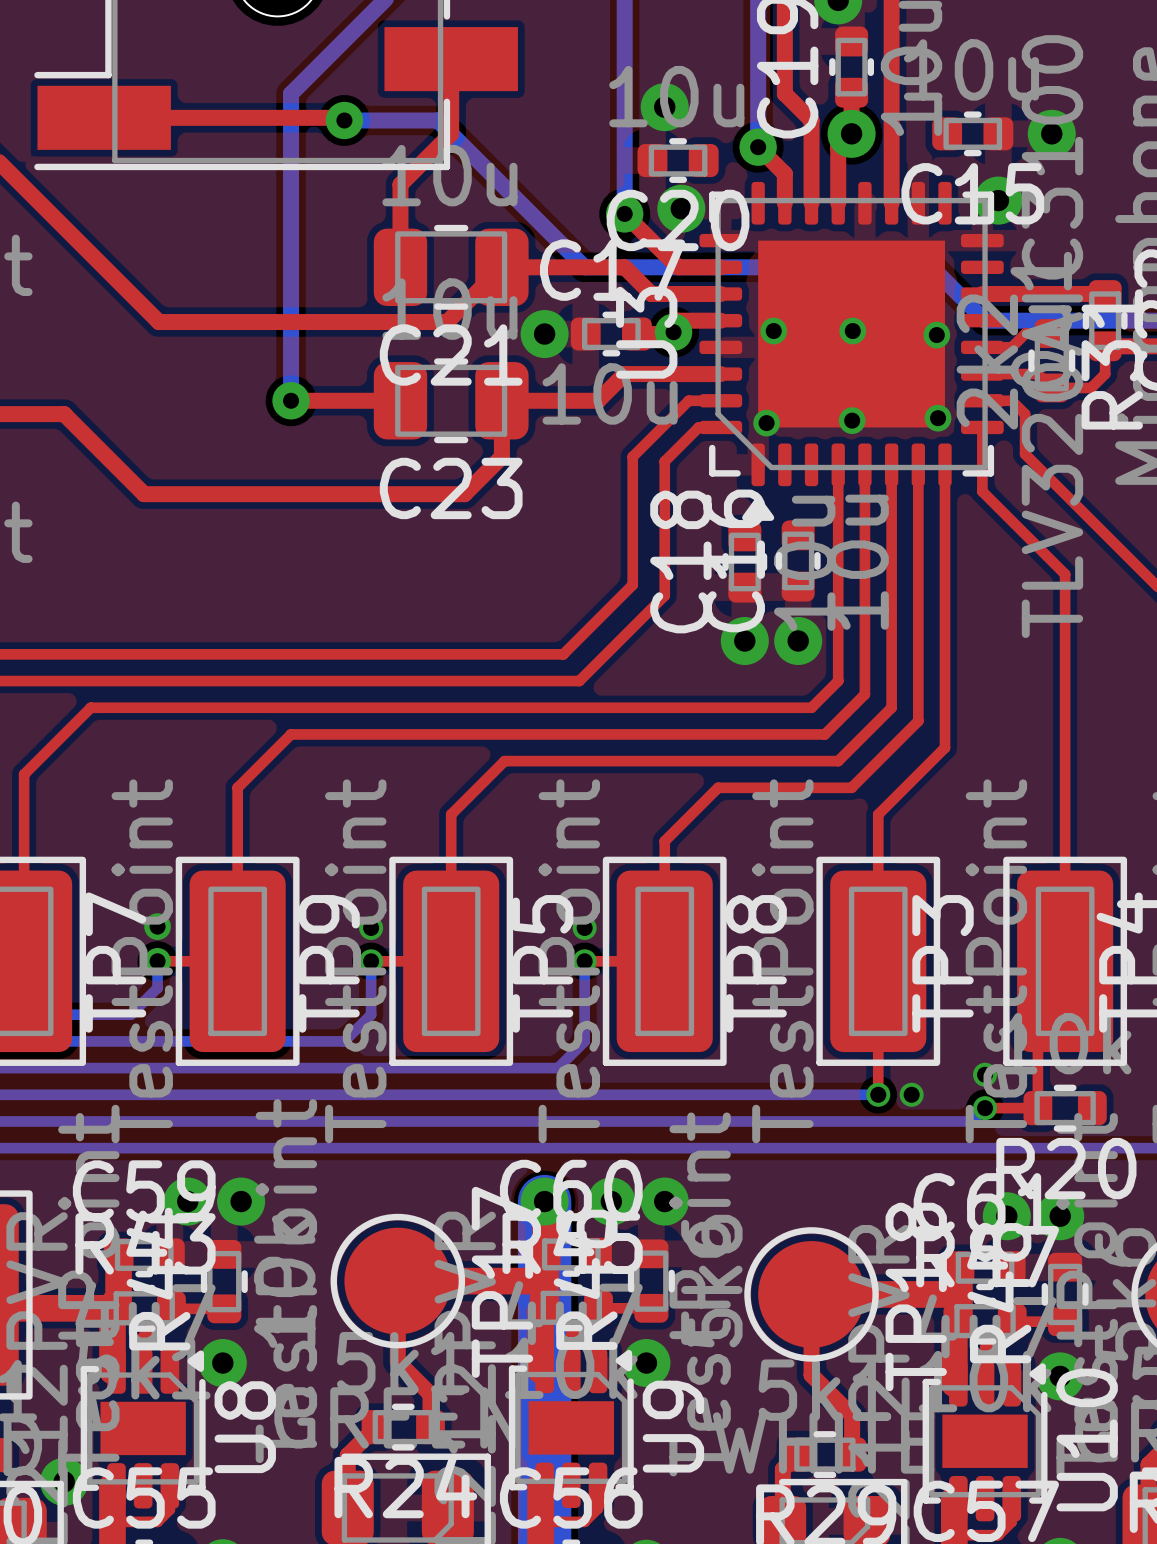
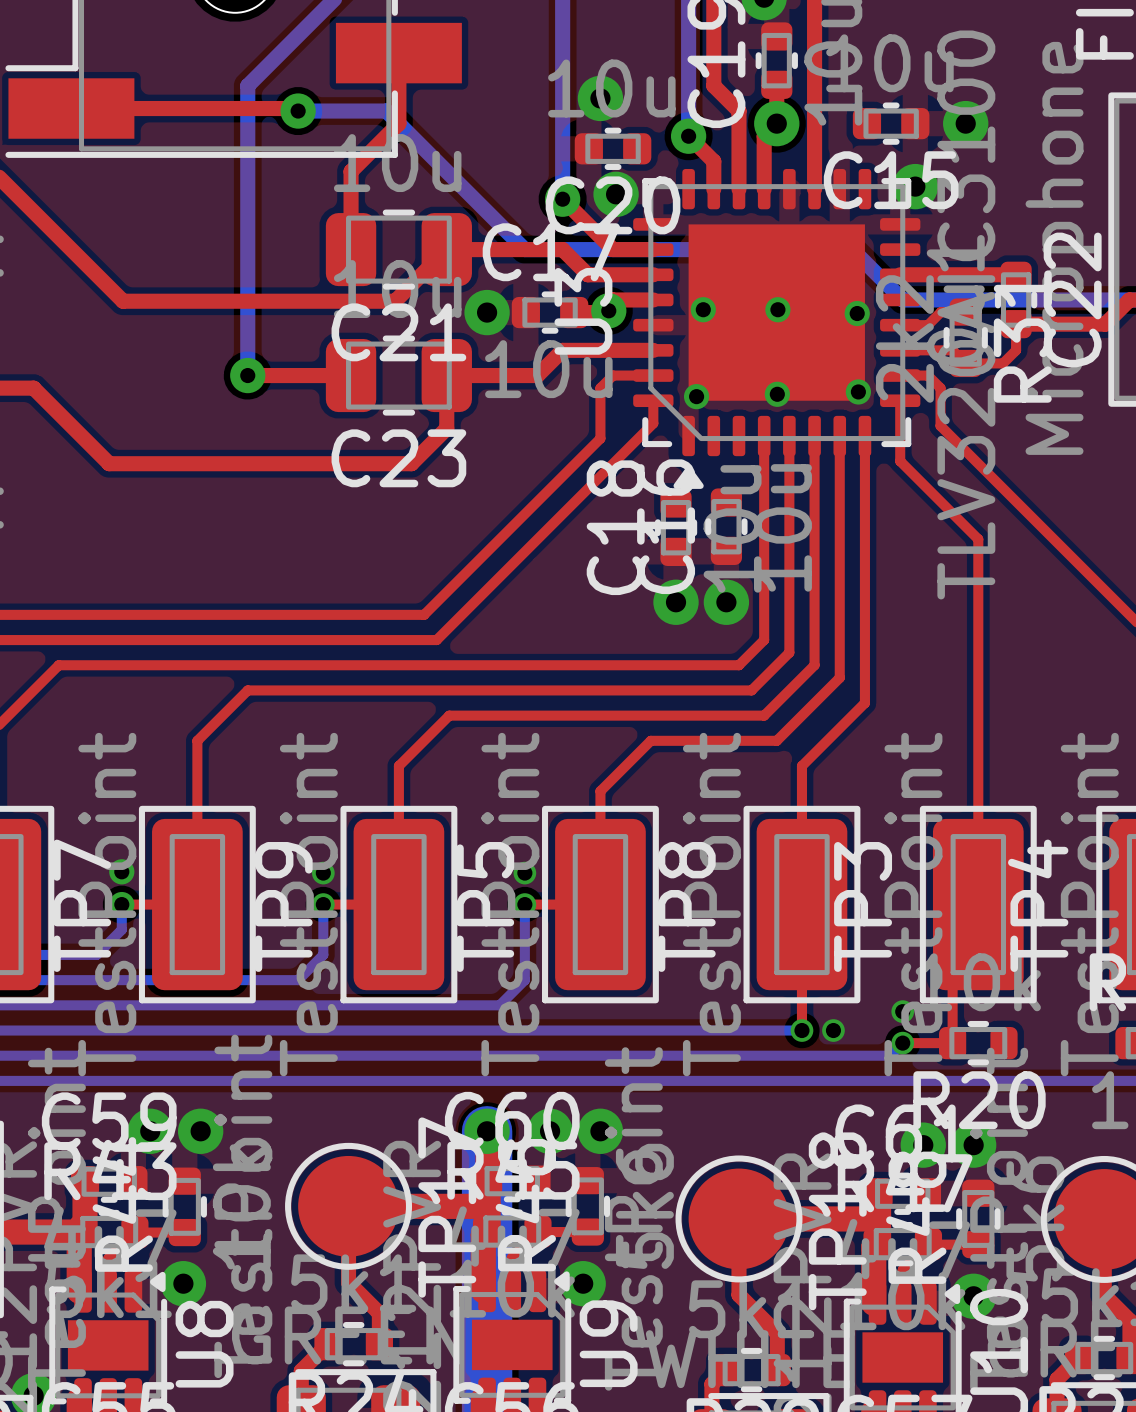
top track: (688, 400) (632, 456) (632, 584) (563, 654) (477, 654) -> none
top track: (720, 427) (698, 427) (664, 461) -> (623, 375) (613, 375) (600, 388) (600, 432)
top track: none -> (653, 400) (653, 423) (436, 640)
top track: (664, 467) (664, 595) (579, 681) (491, 681) -> (600, 438) (424, 614)

